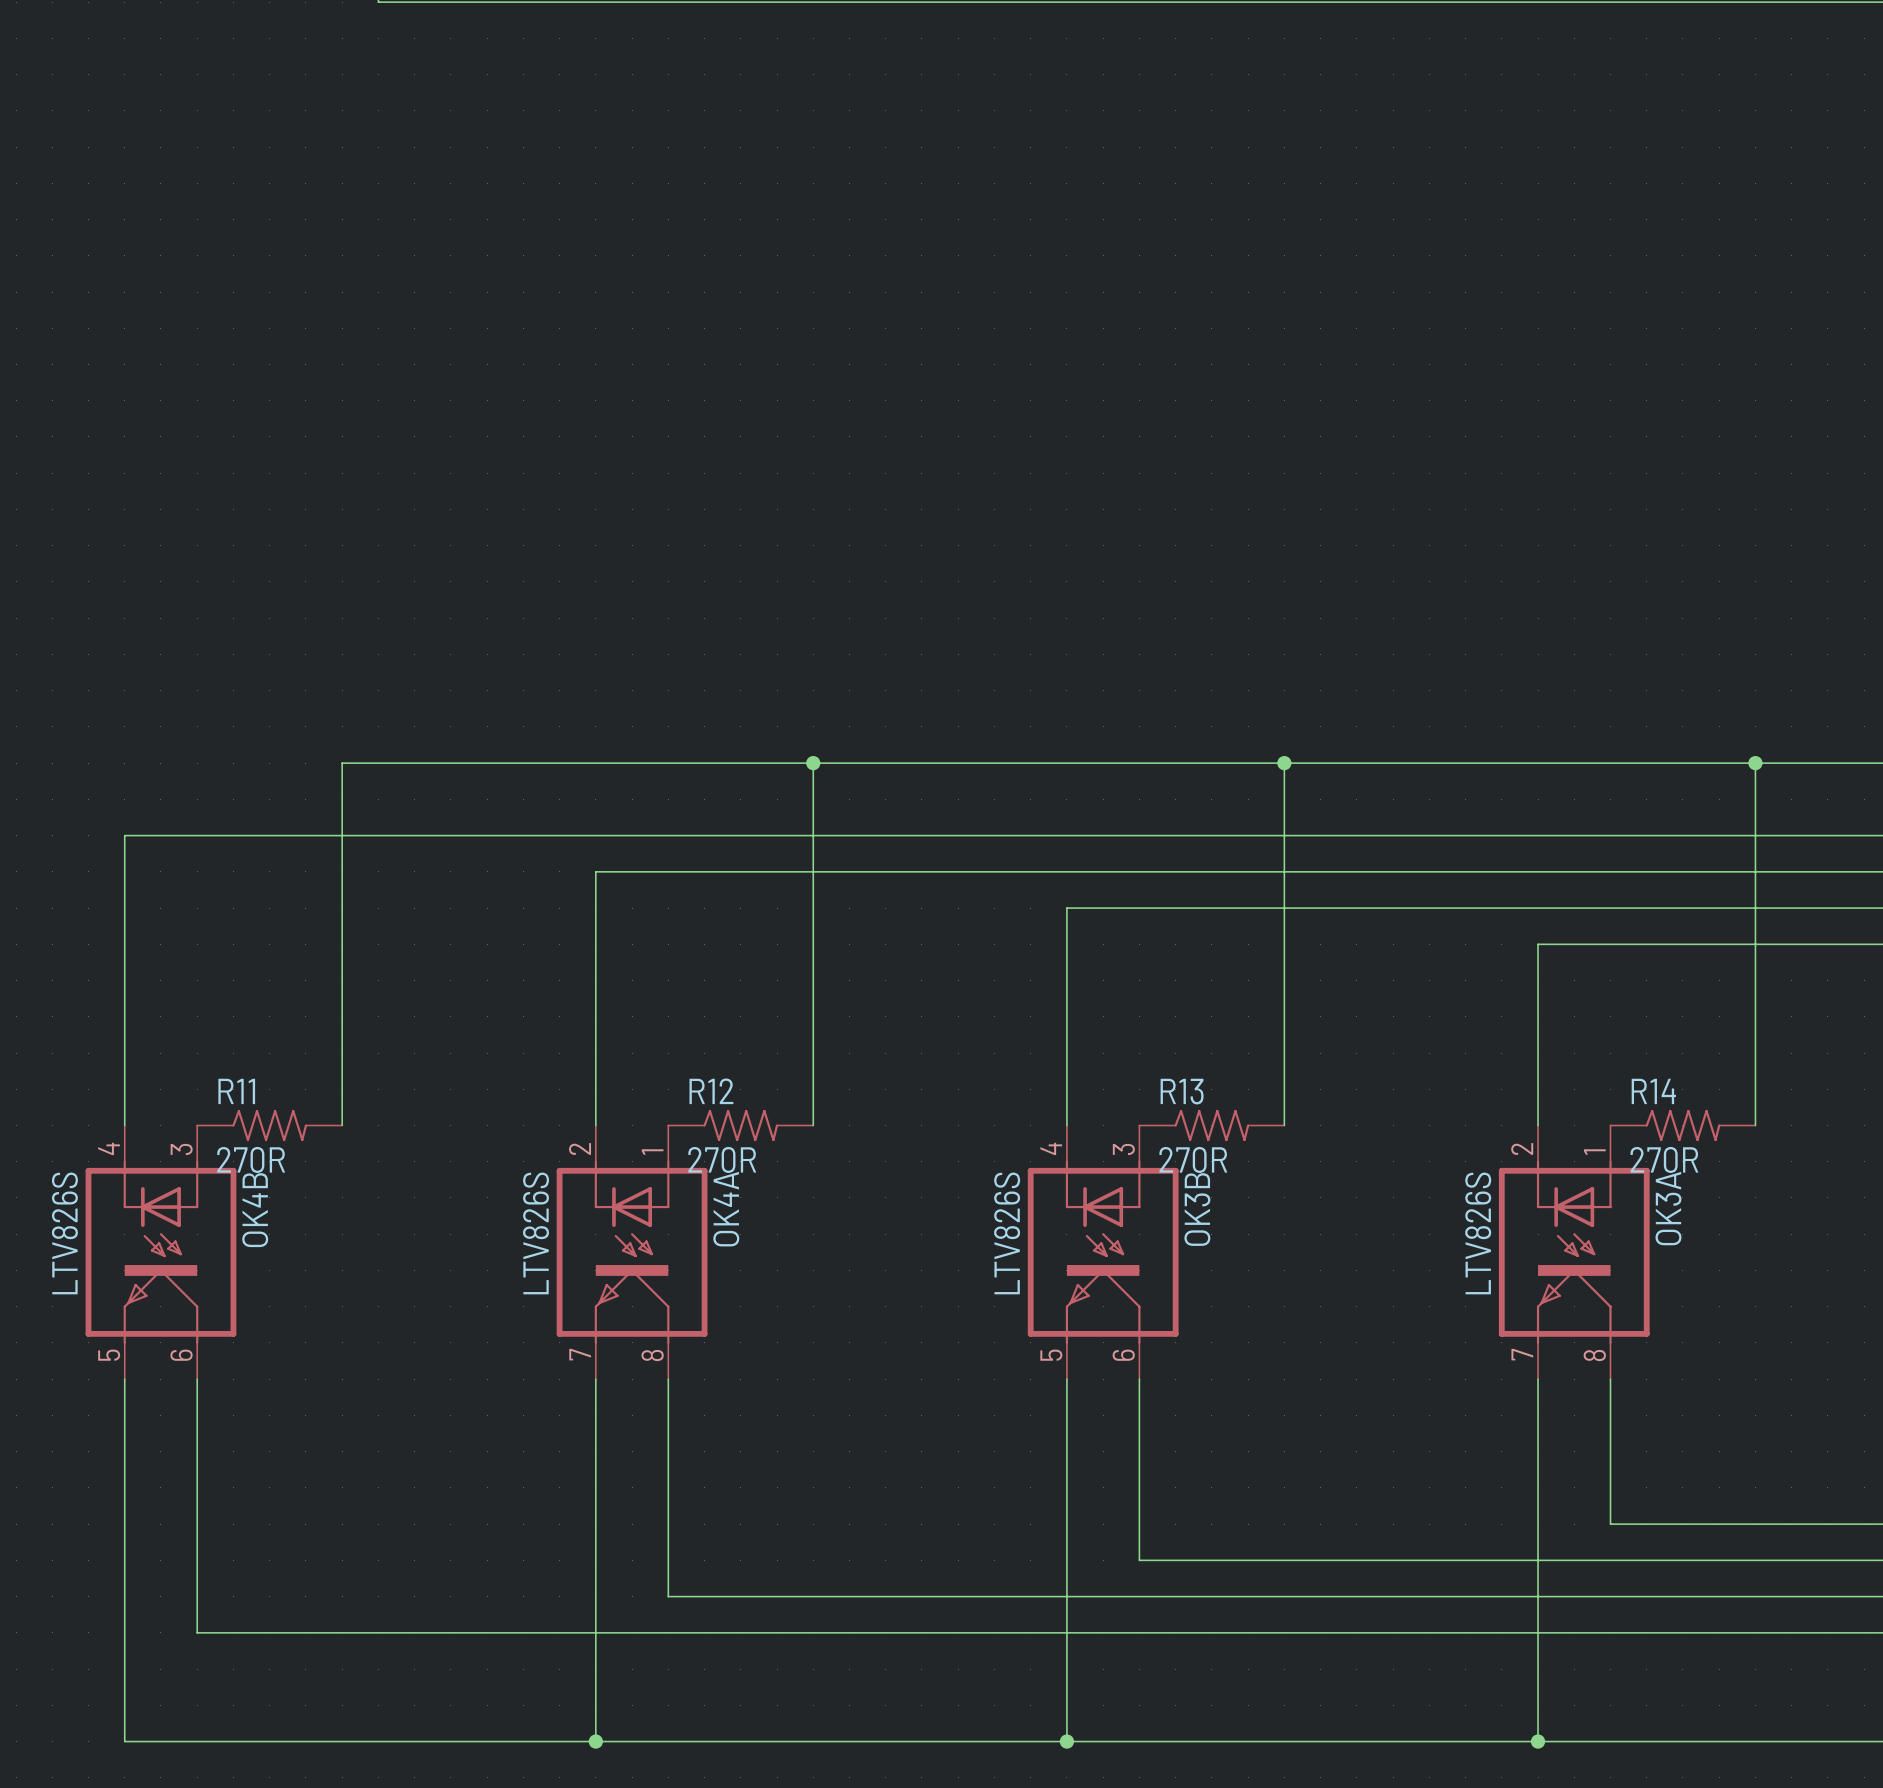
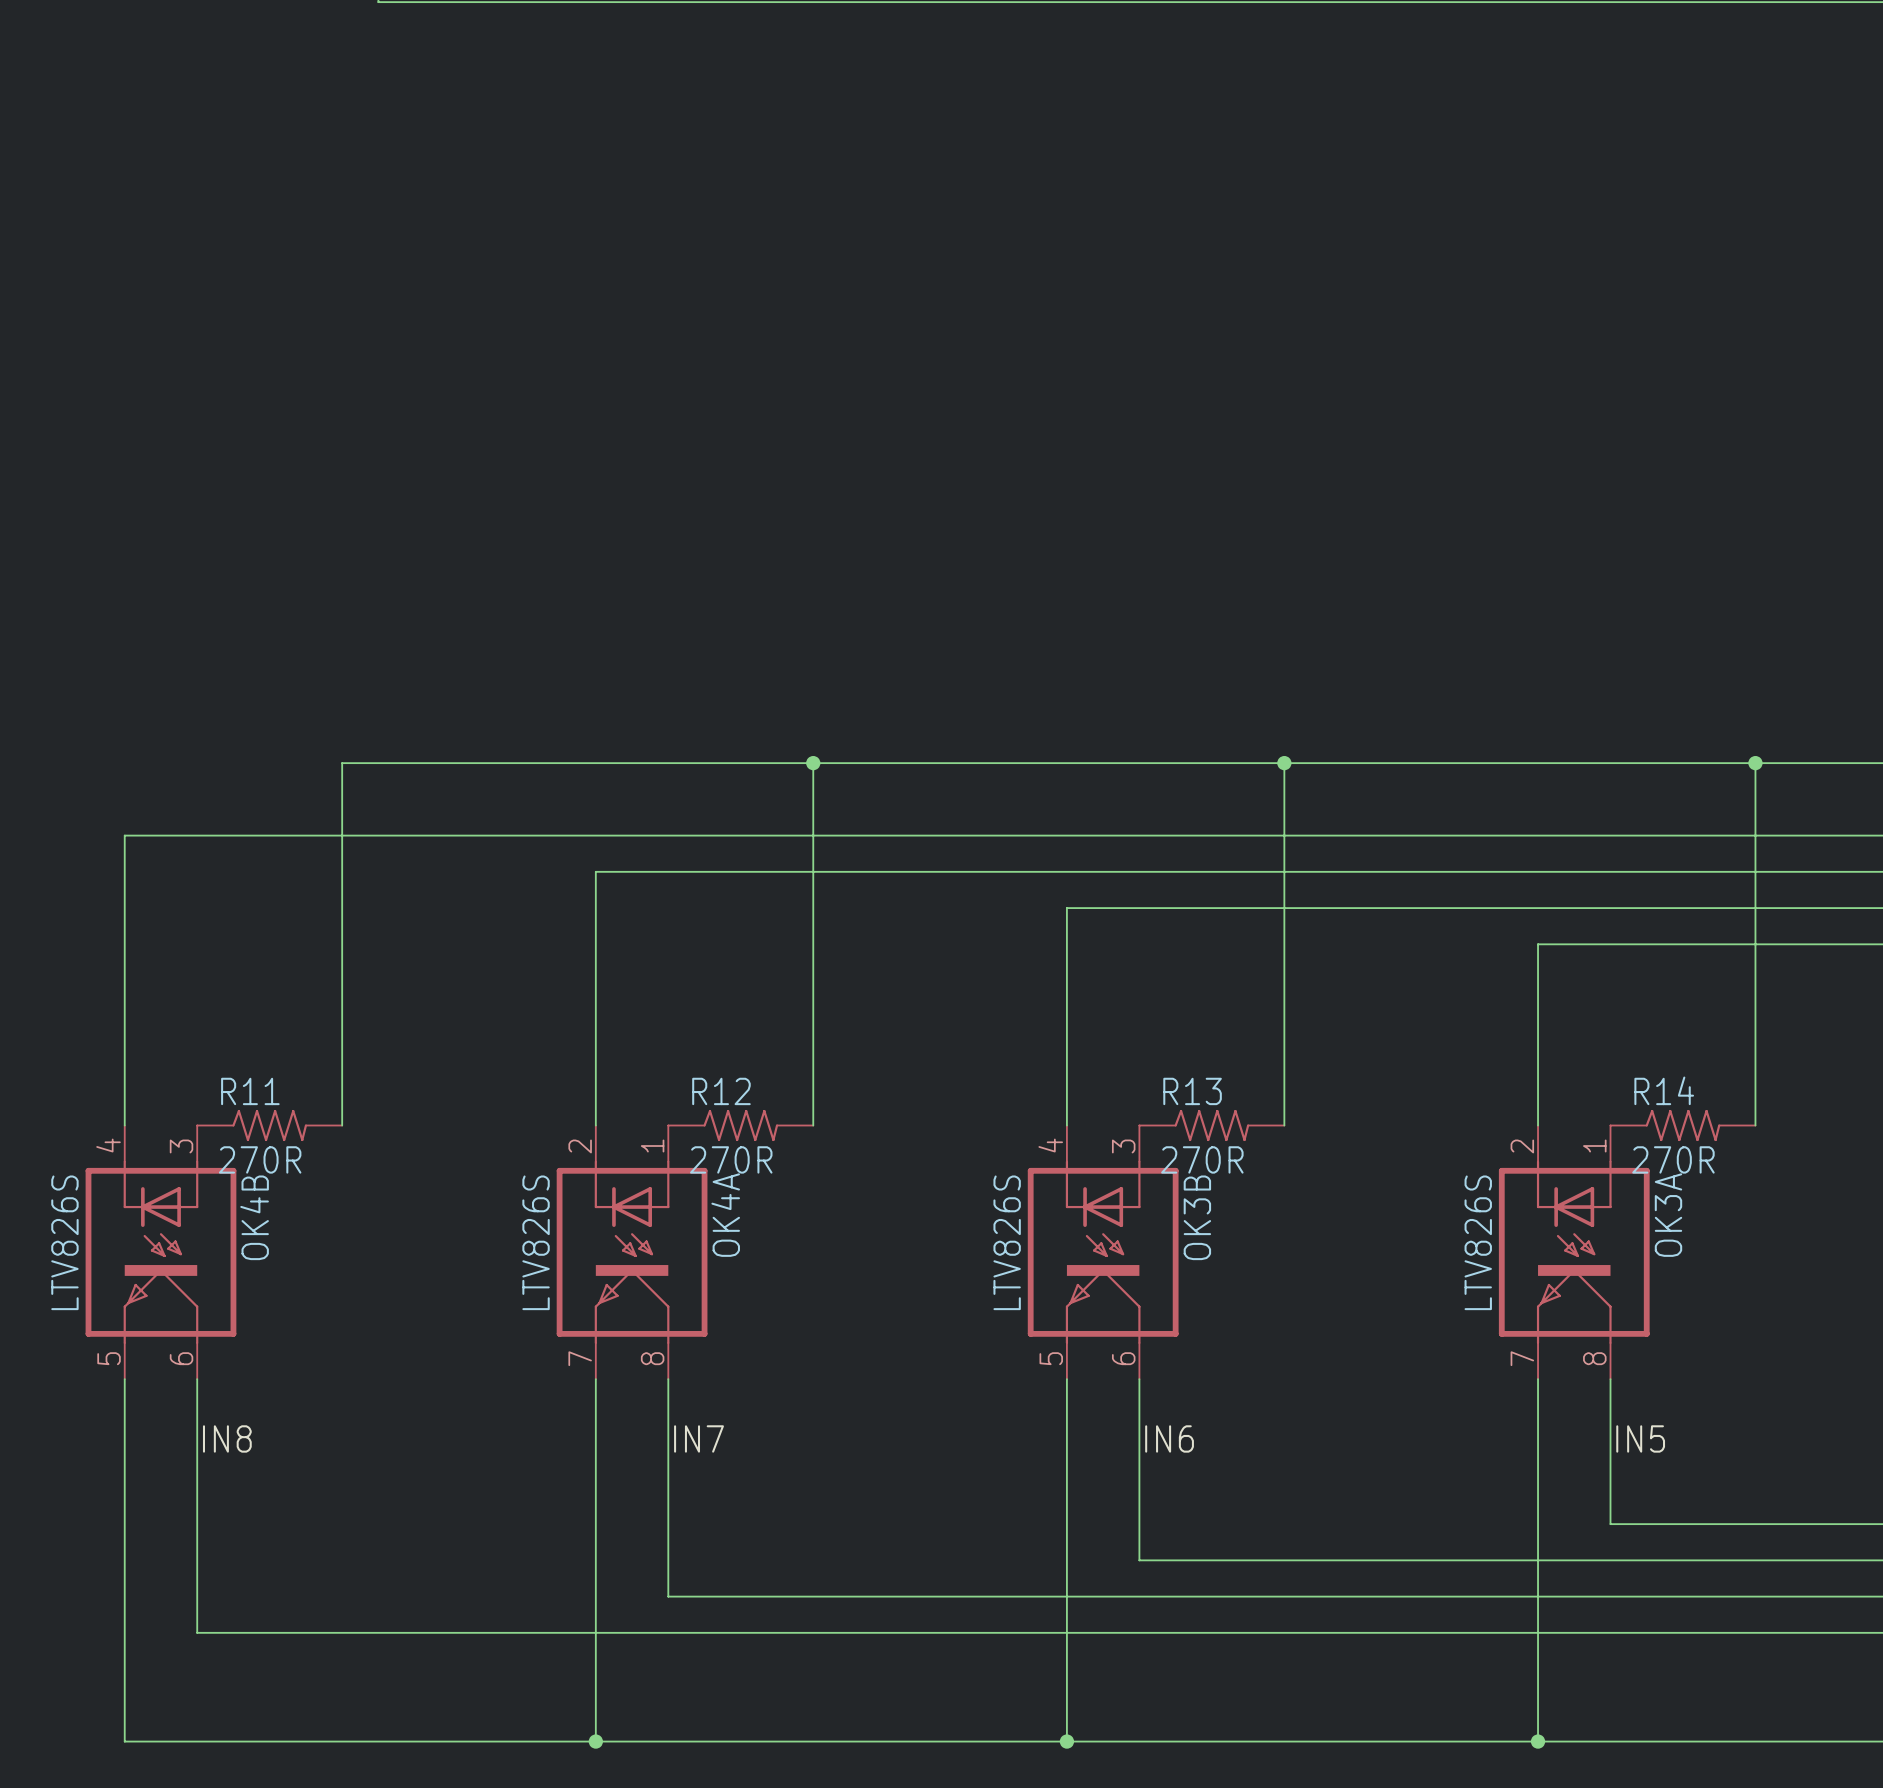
label: none -> IN8 (227, 1438)
label: none -> IN7 (699, 1438)
label: none -> IN6 (1169, 1438)
label: none -> IN5 (1640, 1438)

